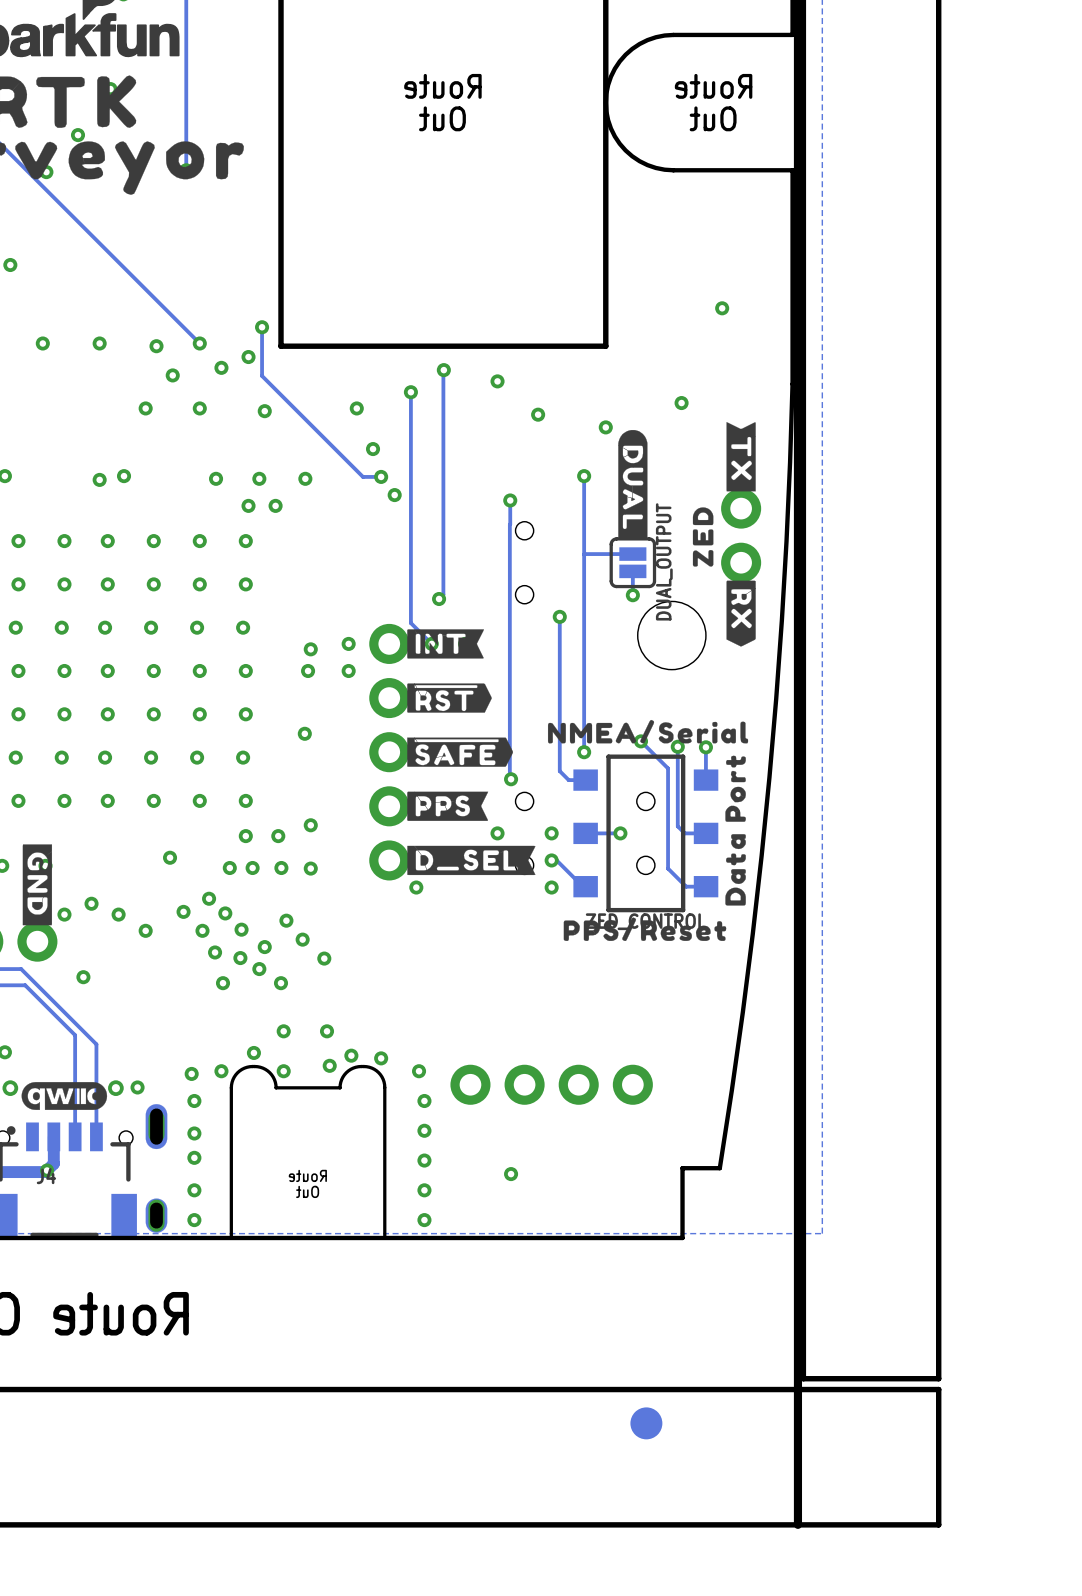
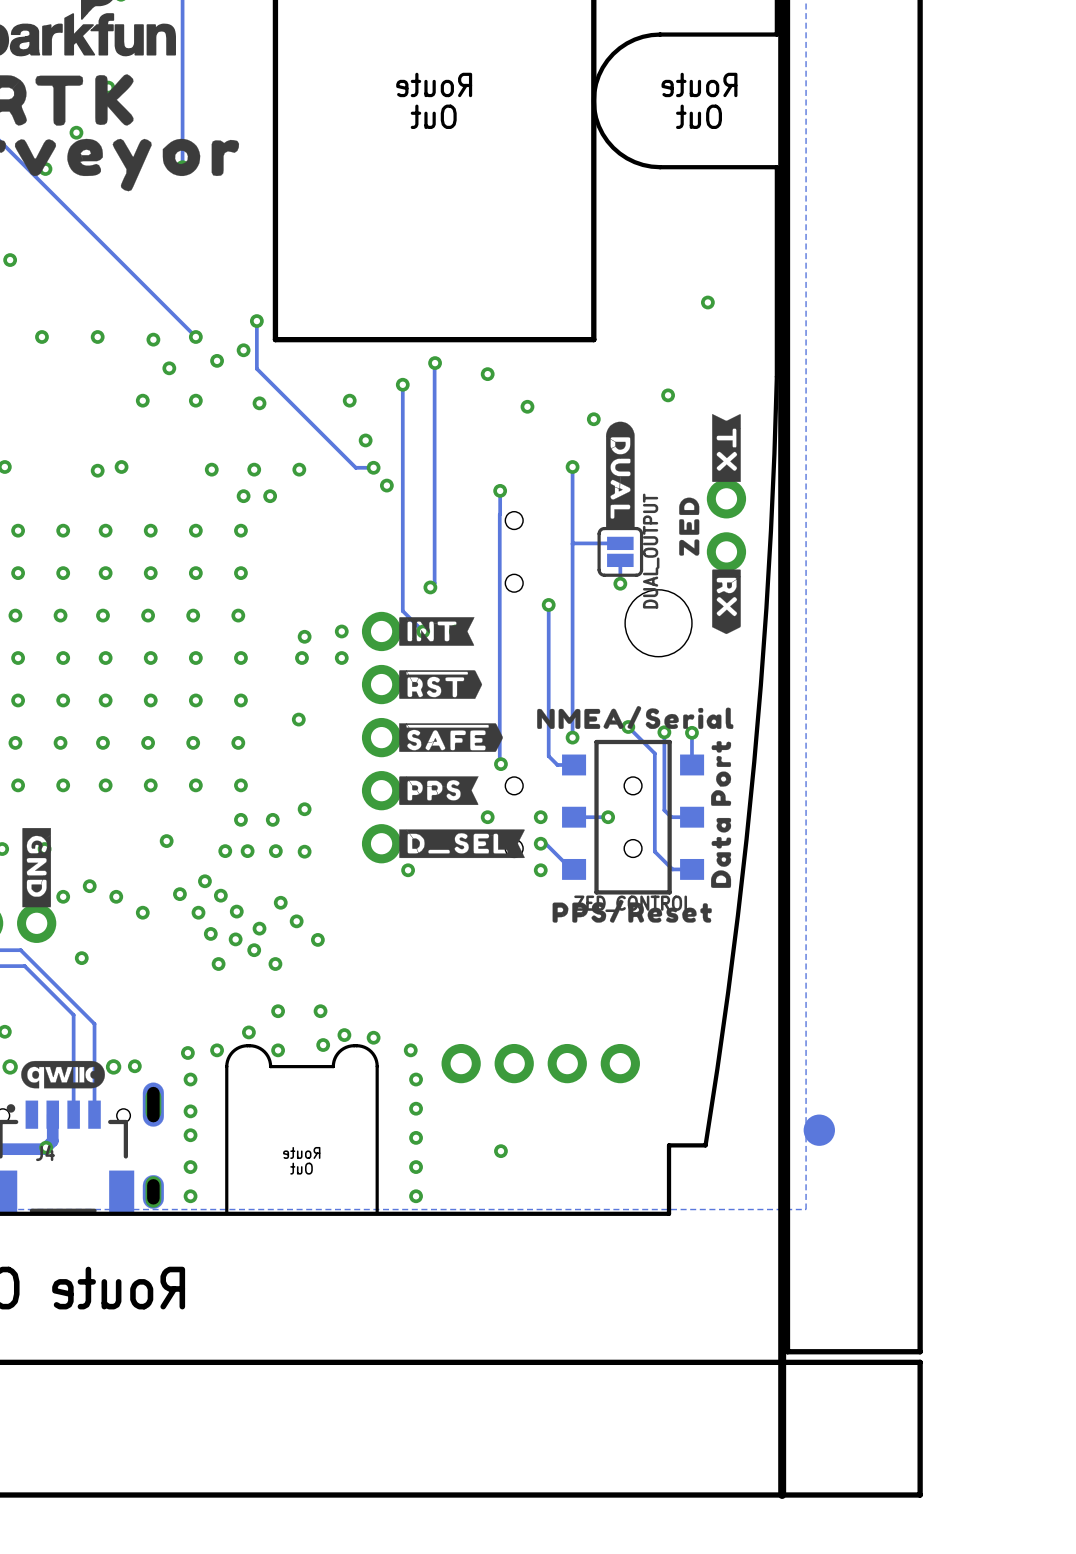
part position: (646, 1423) -> (819, 1130)

